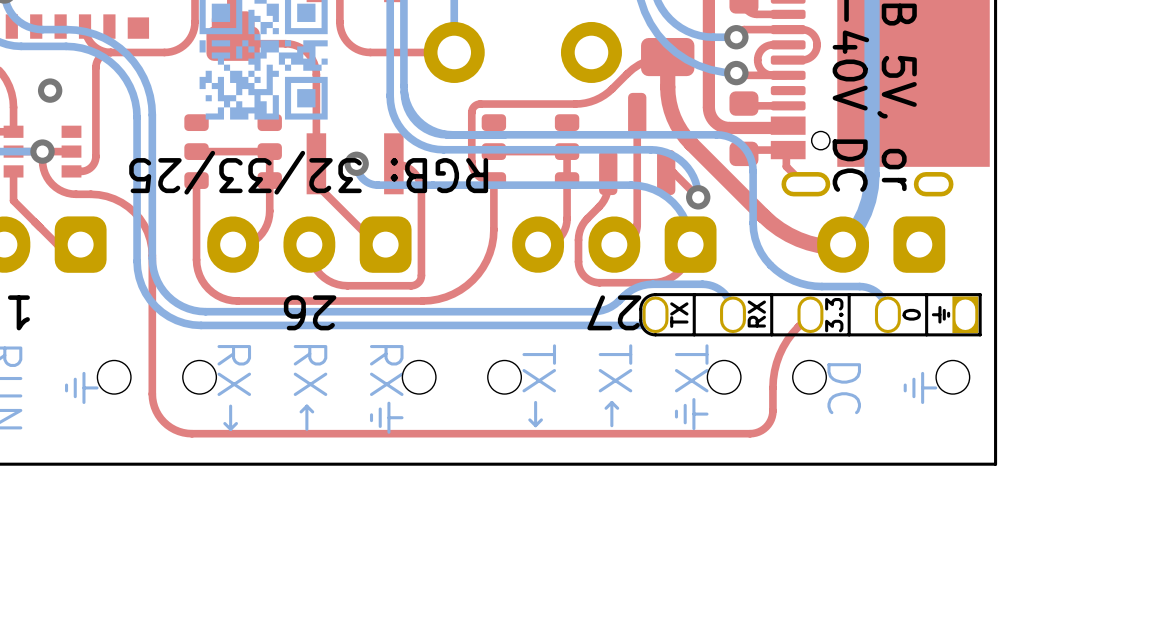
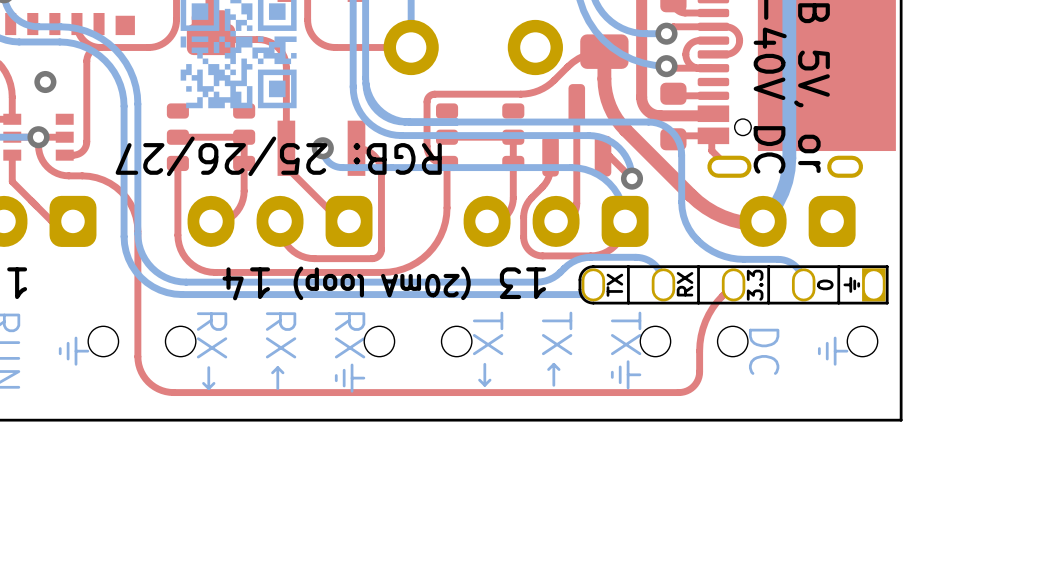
text: RGB: 32/33/25 (308, 172) -> RGB: 25/26/27 (278, 156)
text: 26 (310, 312) -> none
text: none -> 13 (522, 283)
text: 27 (614, 312) -> none
text: none -> 14 (246, 283)
text: none -> (20mA loop) (382, 283)

